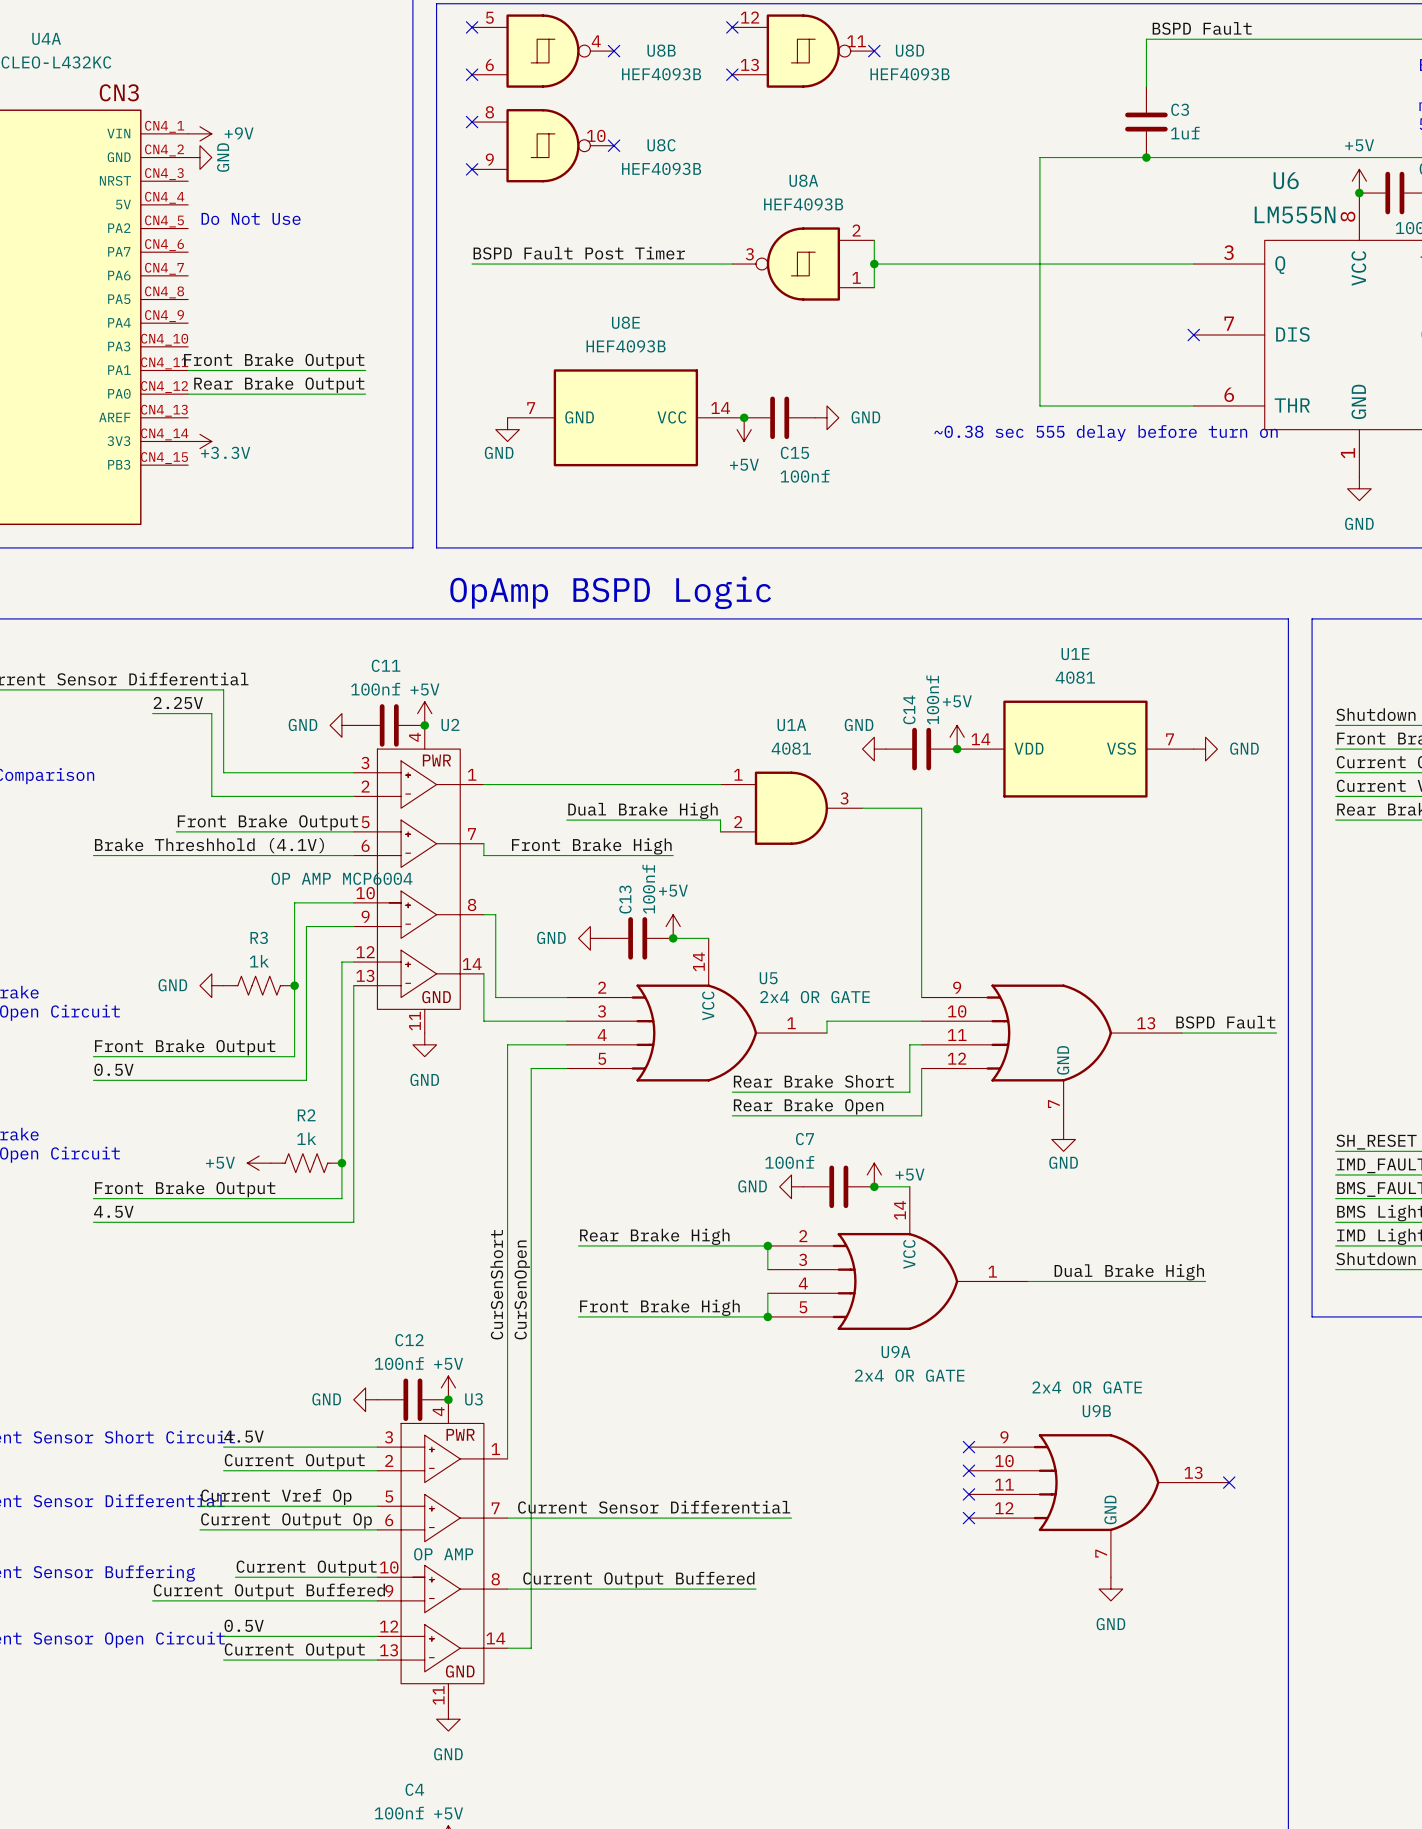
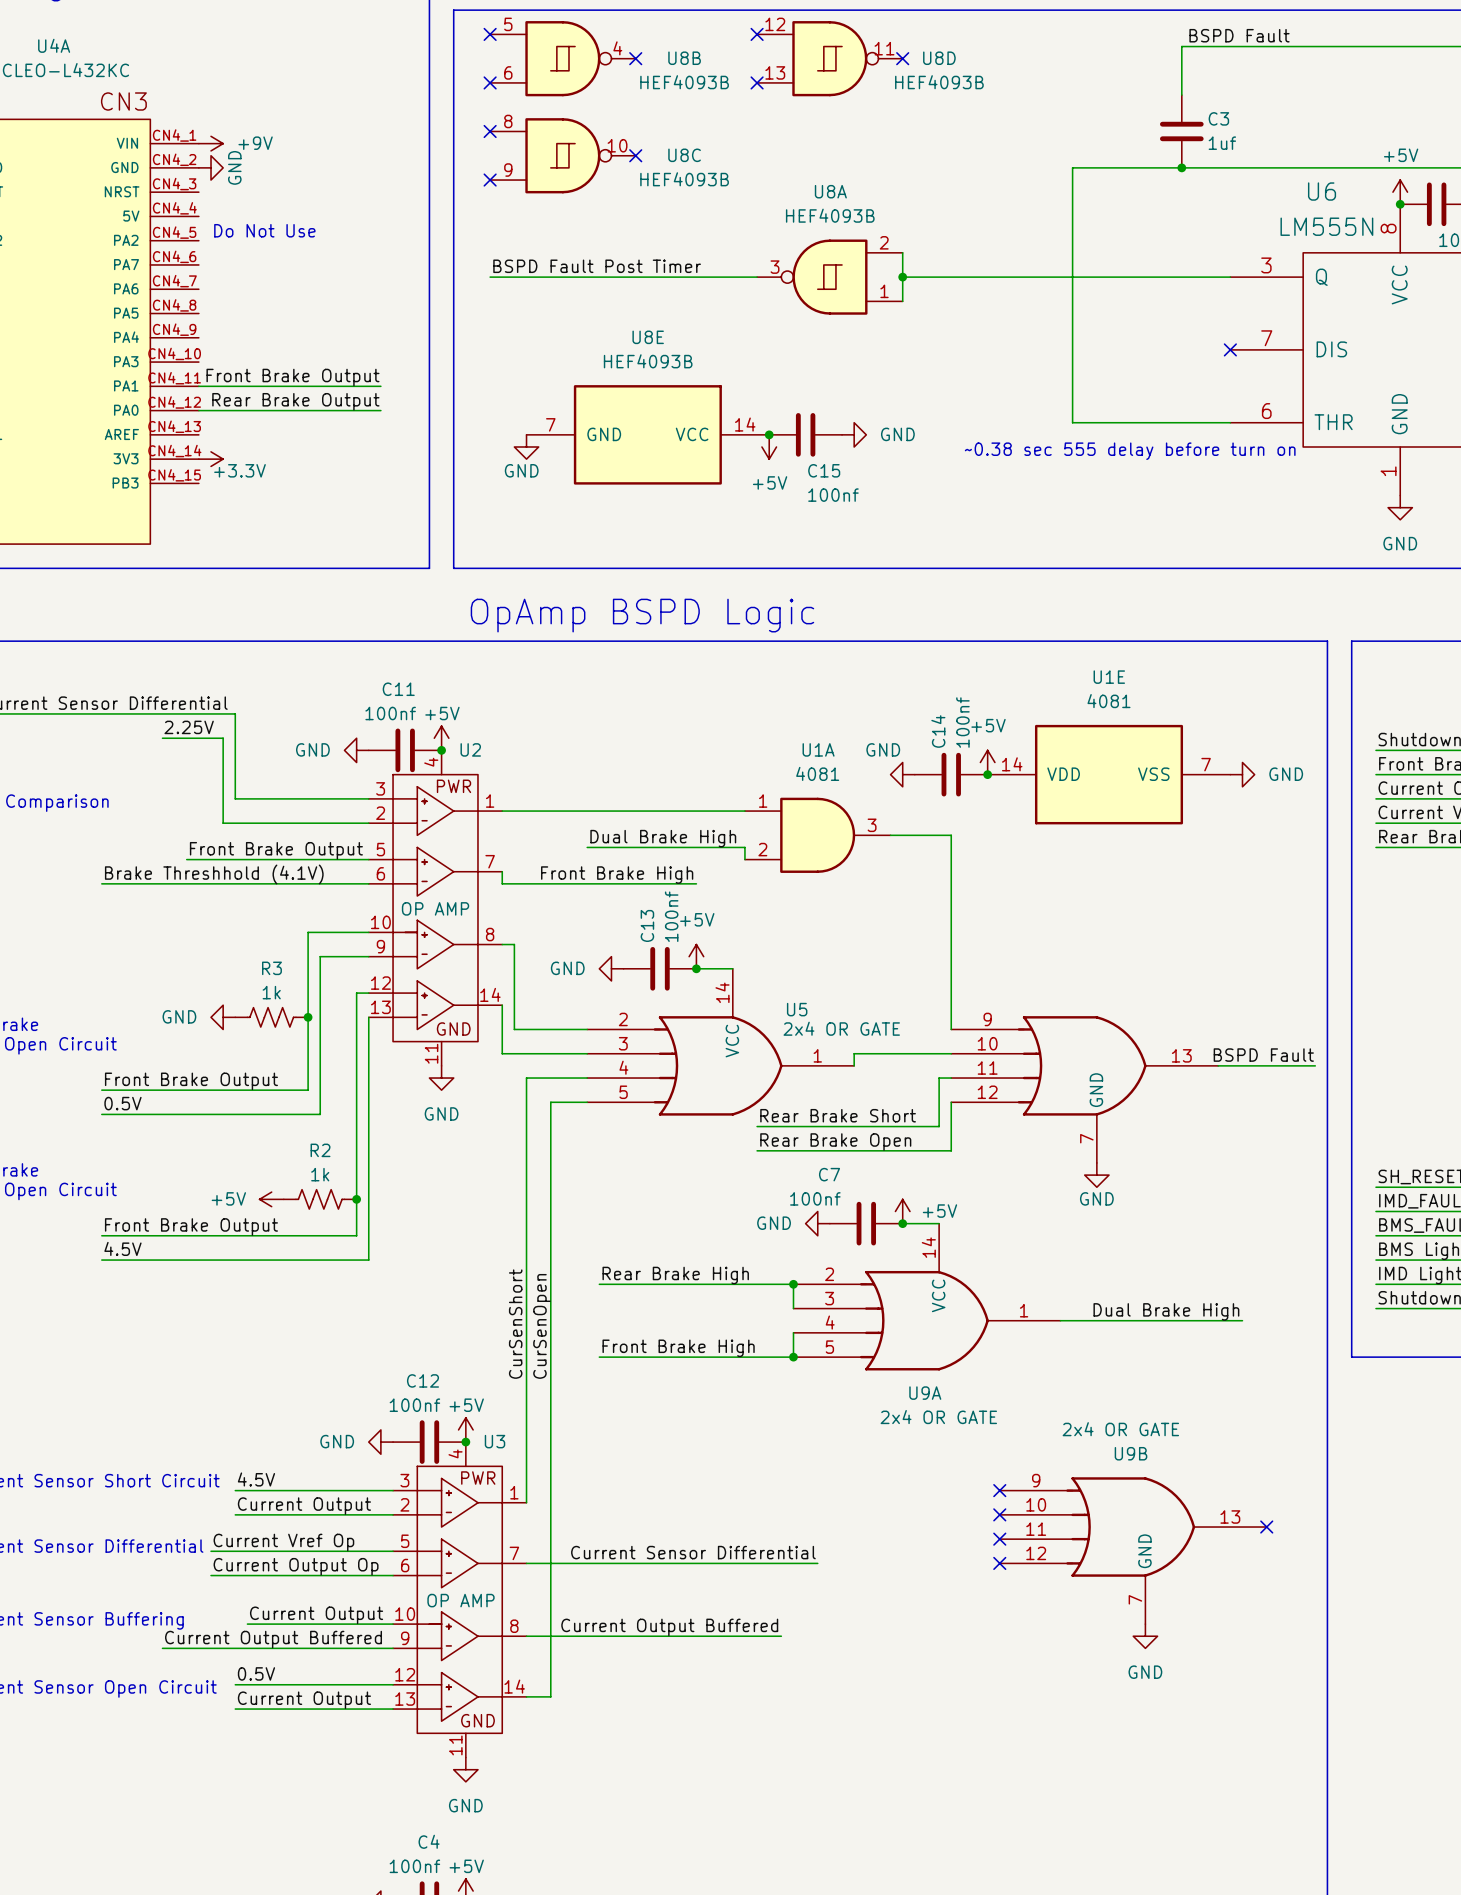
U2 value: OP AMP MCP6004 (342, 878) -> OP AMP (435, 908)

